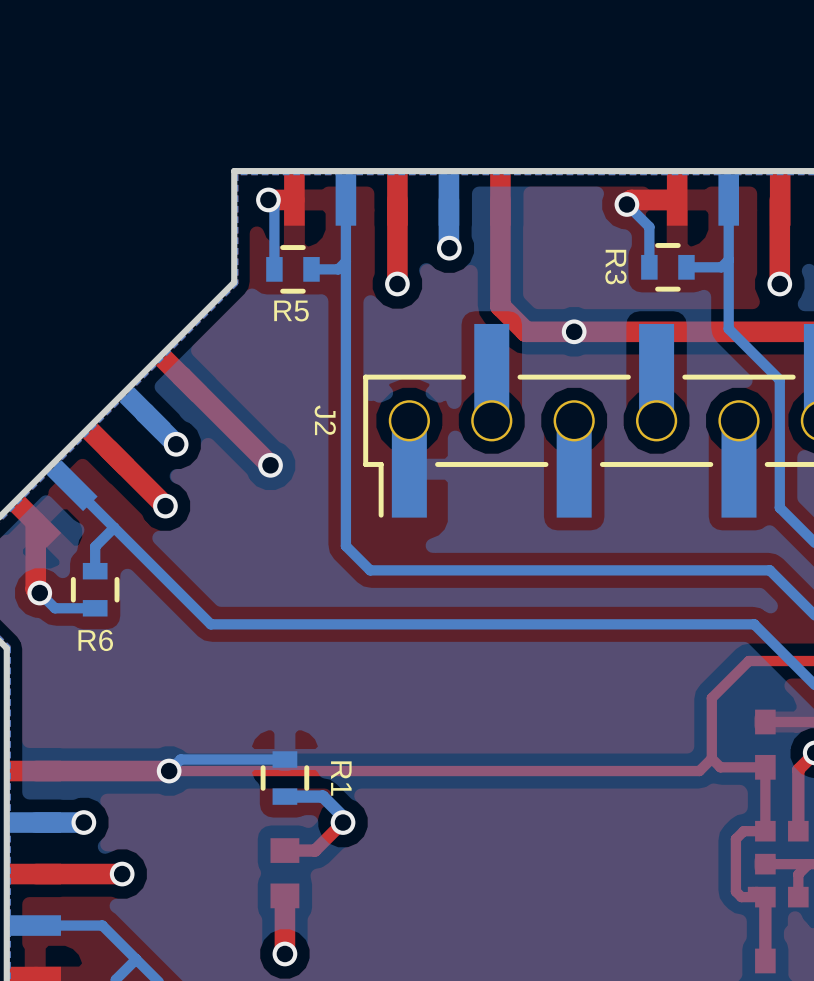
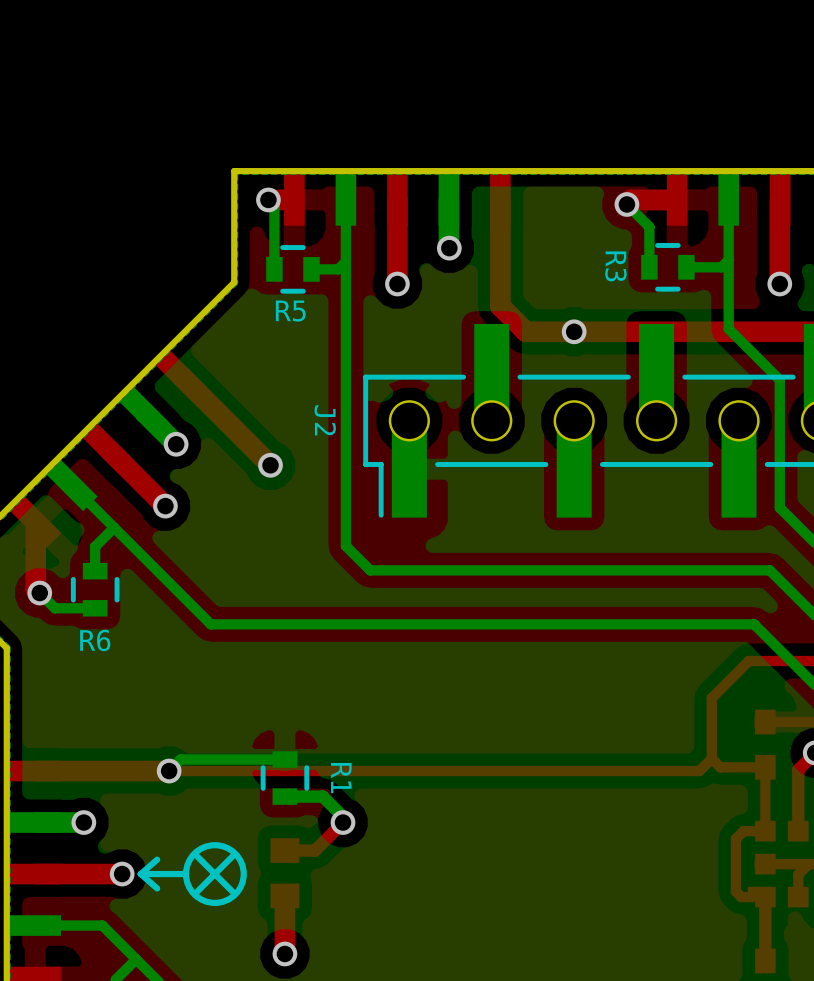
drawing: none -> [137, 842, 247, 907]

